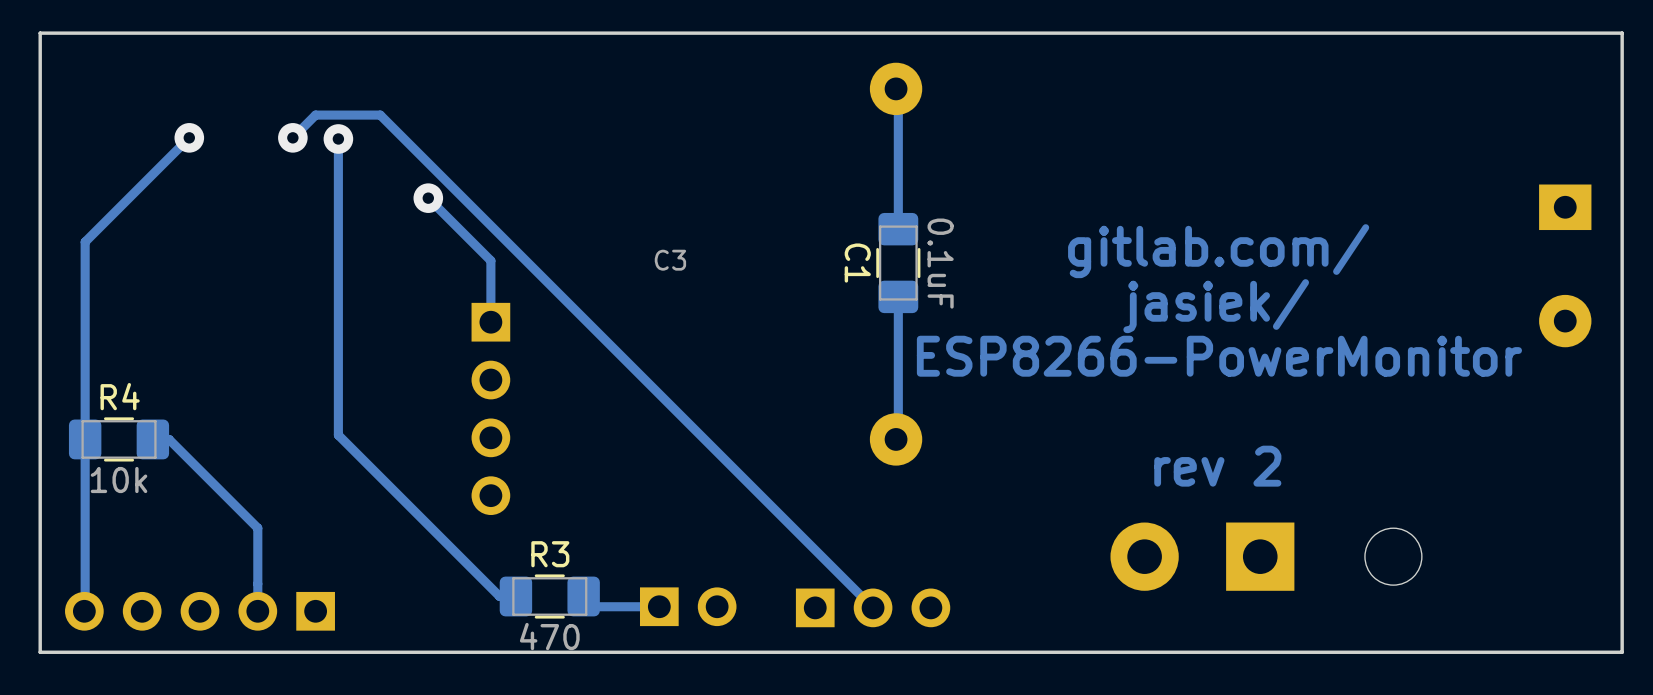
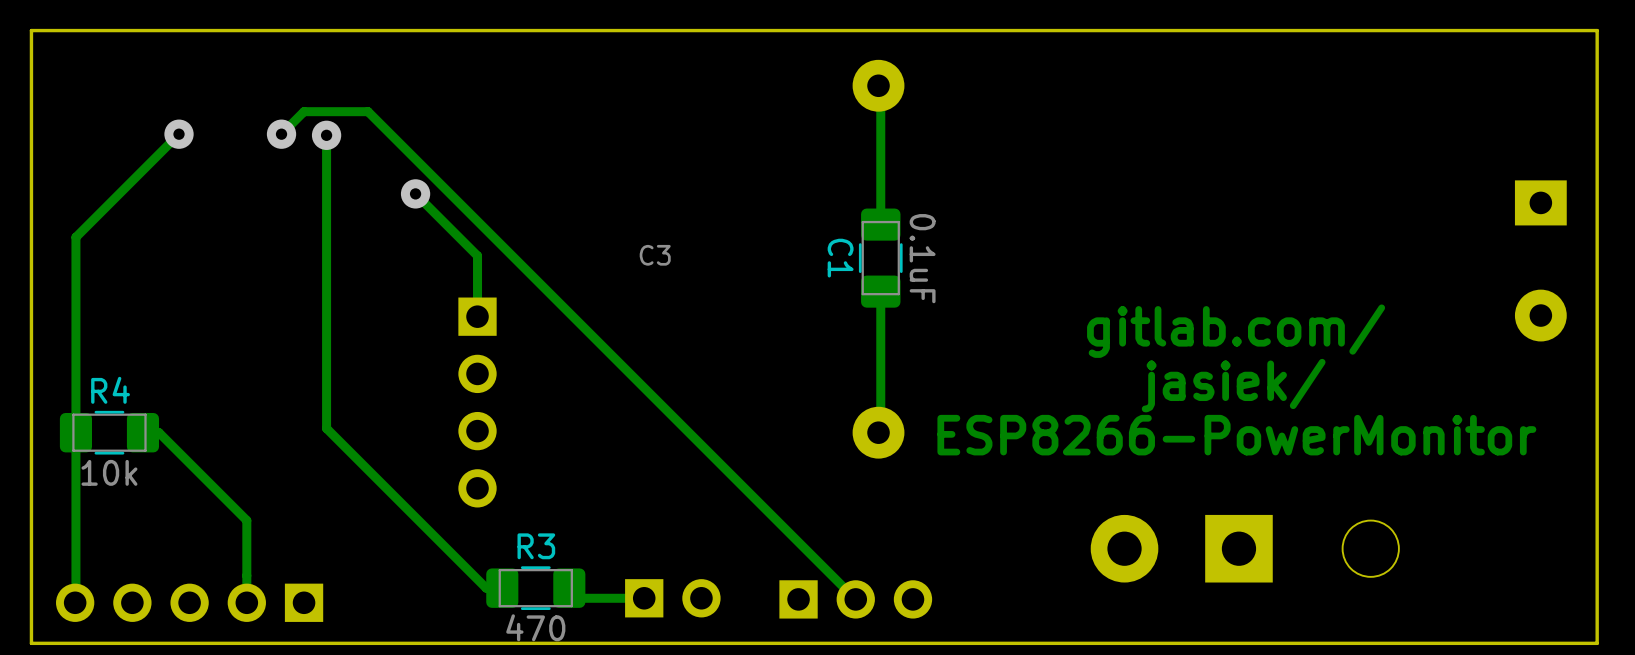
text position: gitlab.com/ (1218, 251) -> gitlab.com/ (1236, 331)
text position: jasiek/ (1216, 306) -> jasiek/ (1233, 385)
text position: ESP8266-PowerMonitor (1219, 356) -> ESP8266-PowerMonitor (1236, 435)
text: rev 2 (1217, 466) -> none

